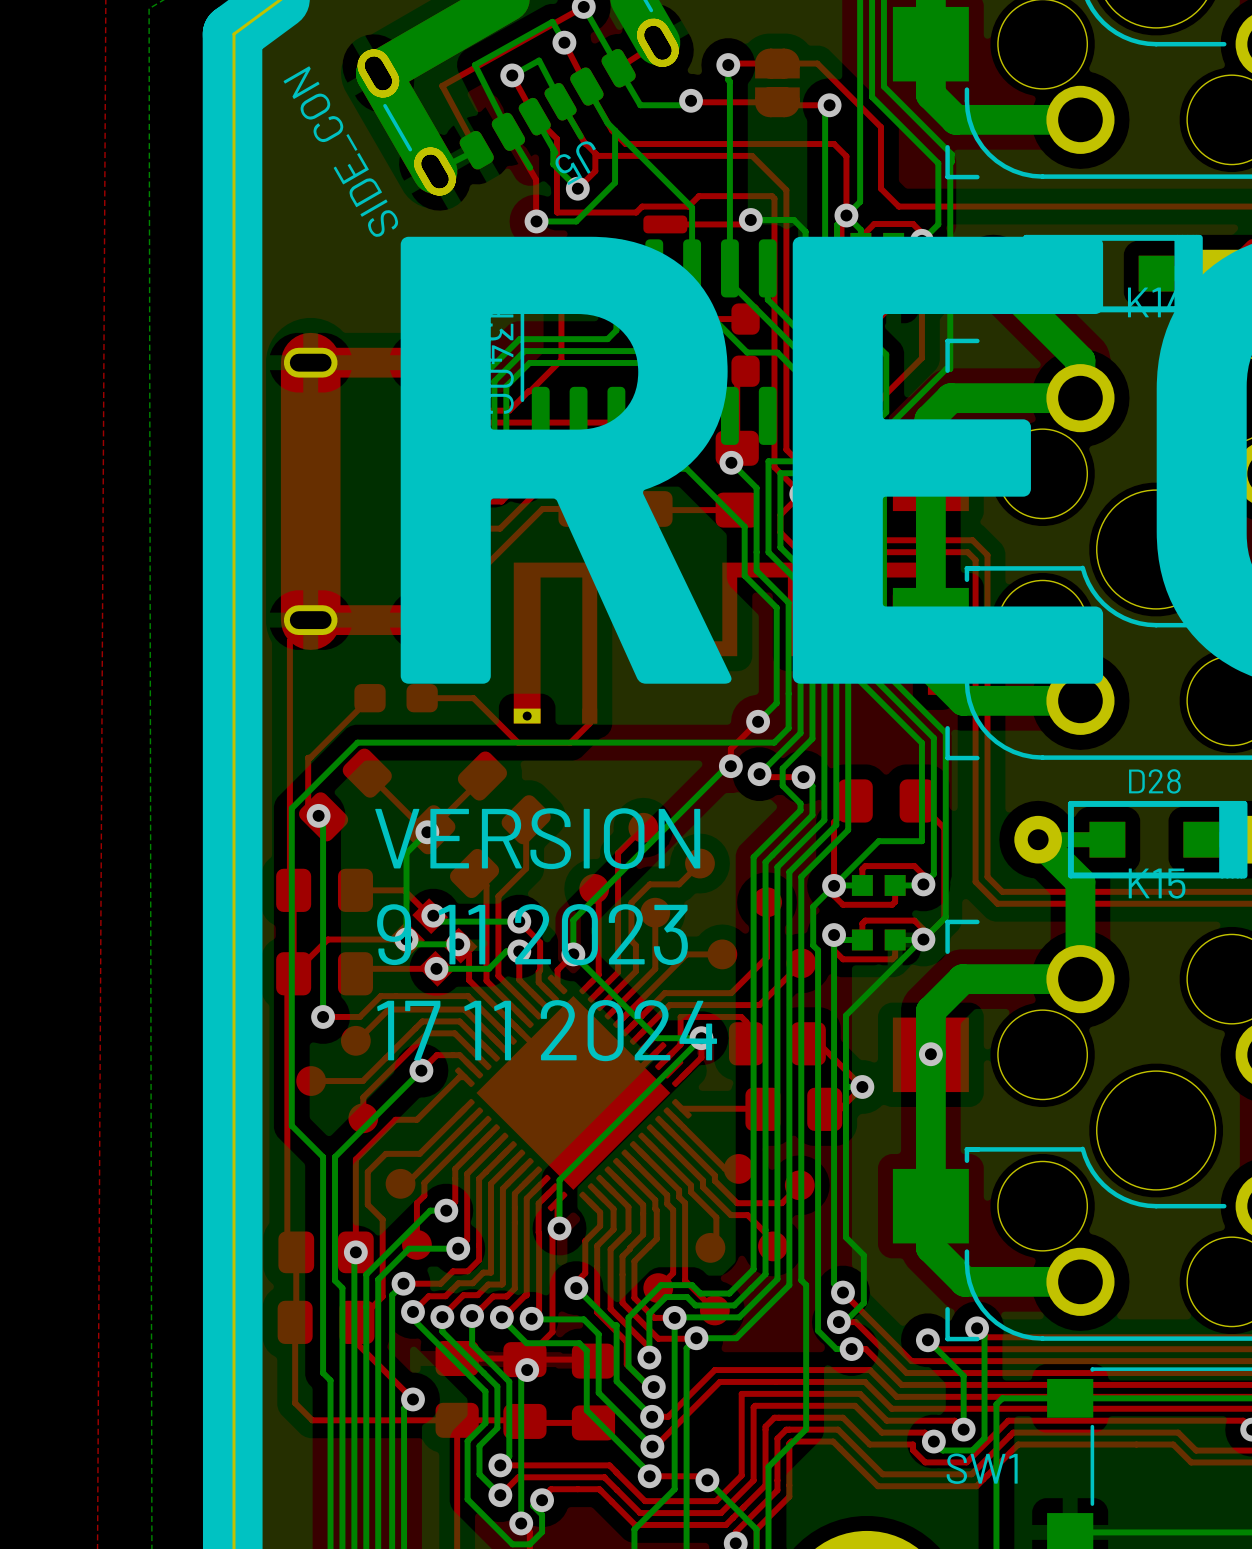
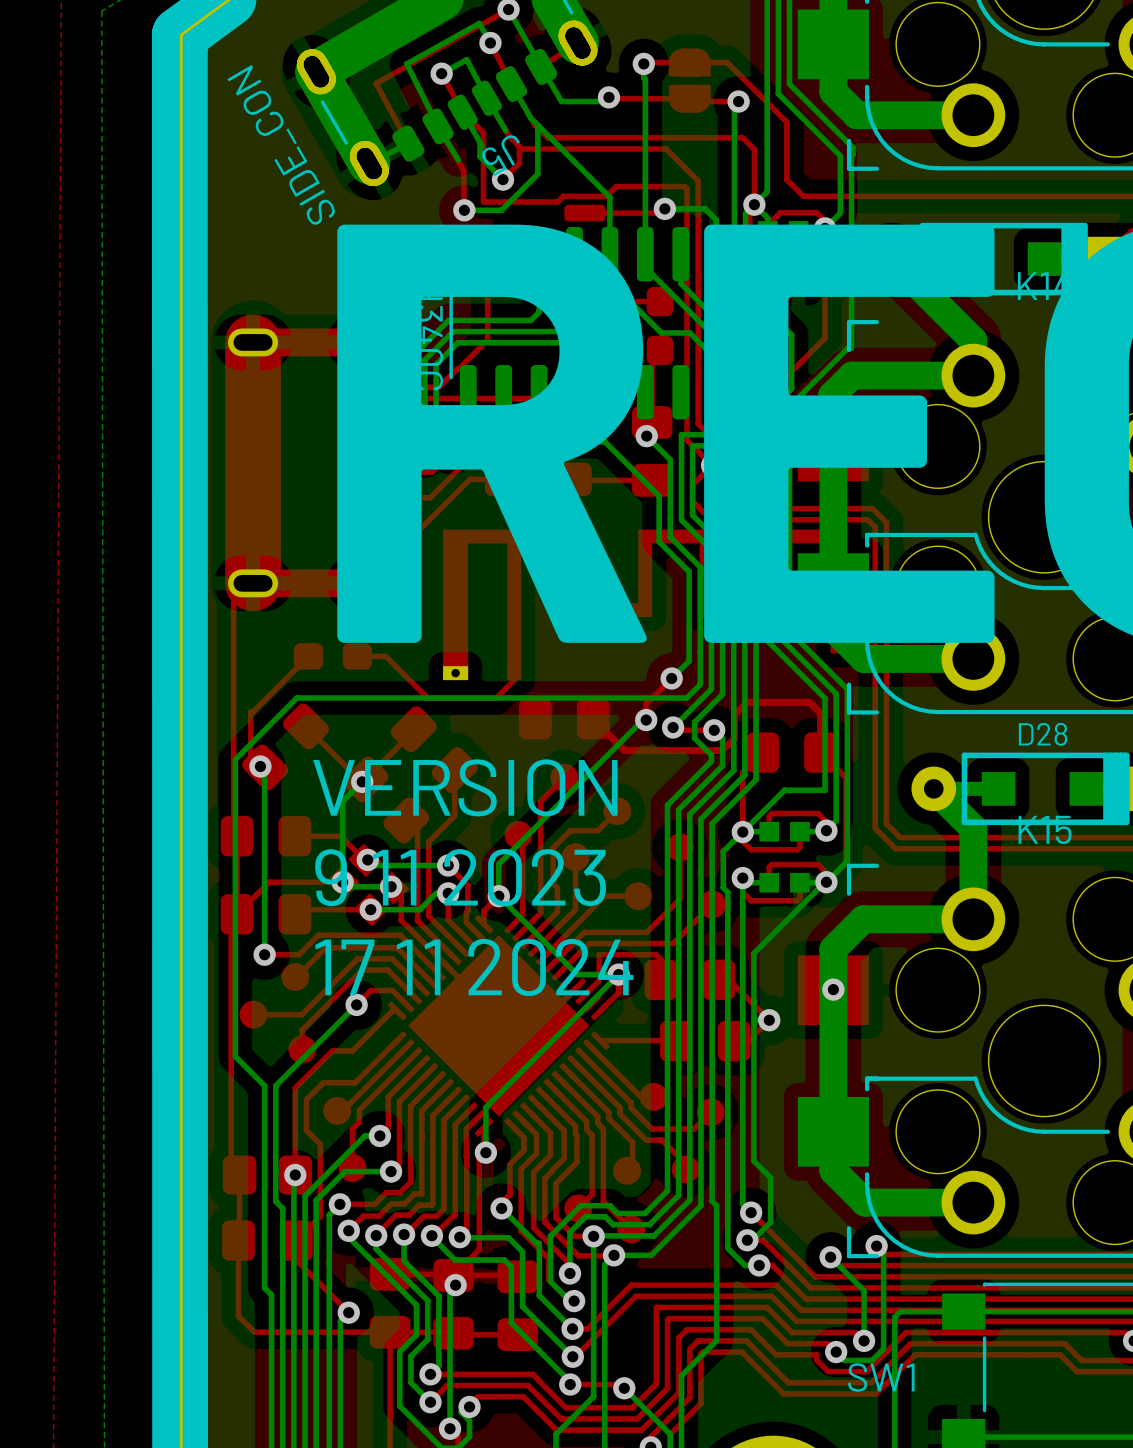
top track: (452, 698) (473, 698) (518, 742) -> (385, 656) (427, 698) (447, 698)
part: none -> (564, 719)
top track: none -> (593, 719) (624, 750) (722, 750) (734, 738) (734, 714) (746, 702) (809, 702) (820, 713) (820, 752)

